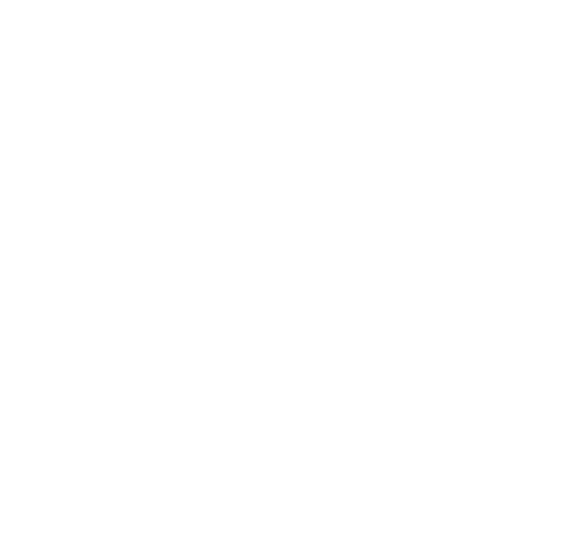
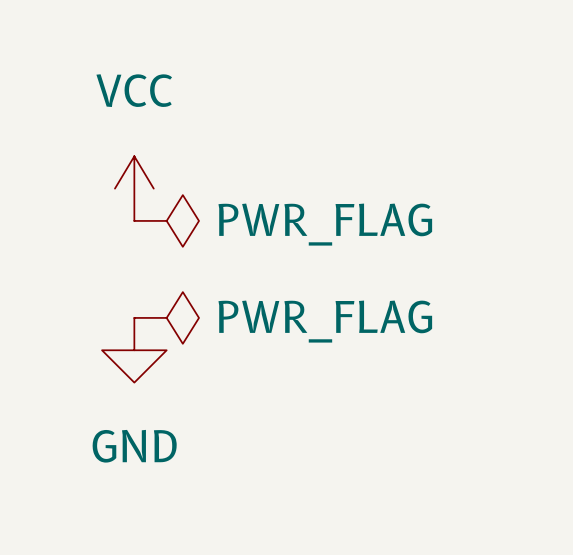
power symbol: none -> VCC (134, 188)
power symbol: none -> PWR_FLAG (166, 220)
power symbol: none -> PWR_FLAG (166, 317)
power symbol: none -> GND (134, 350)

